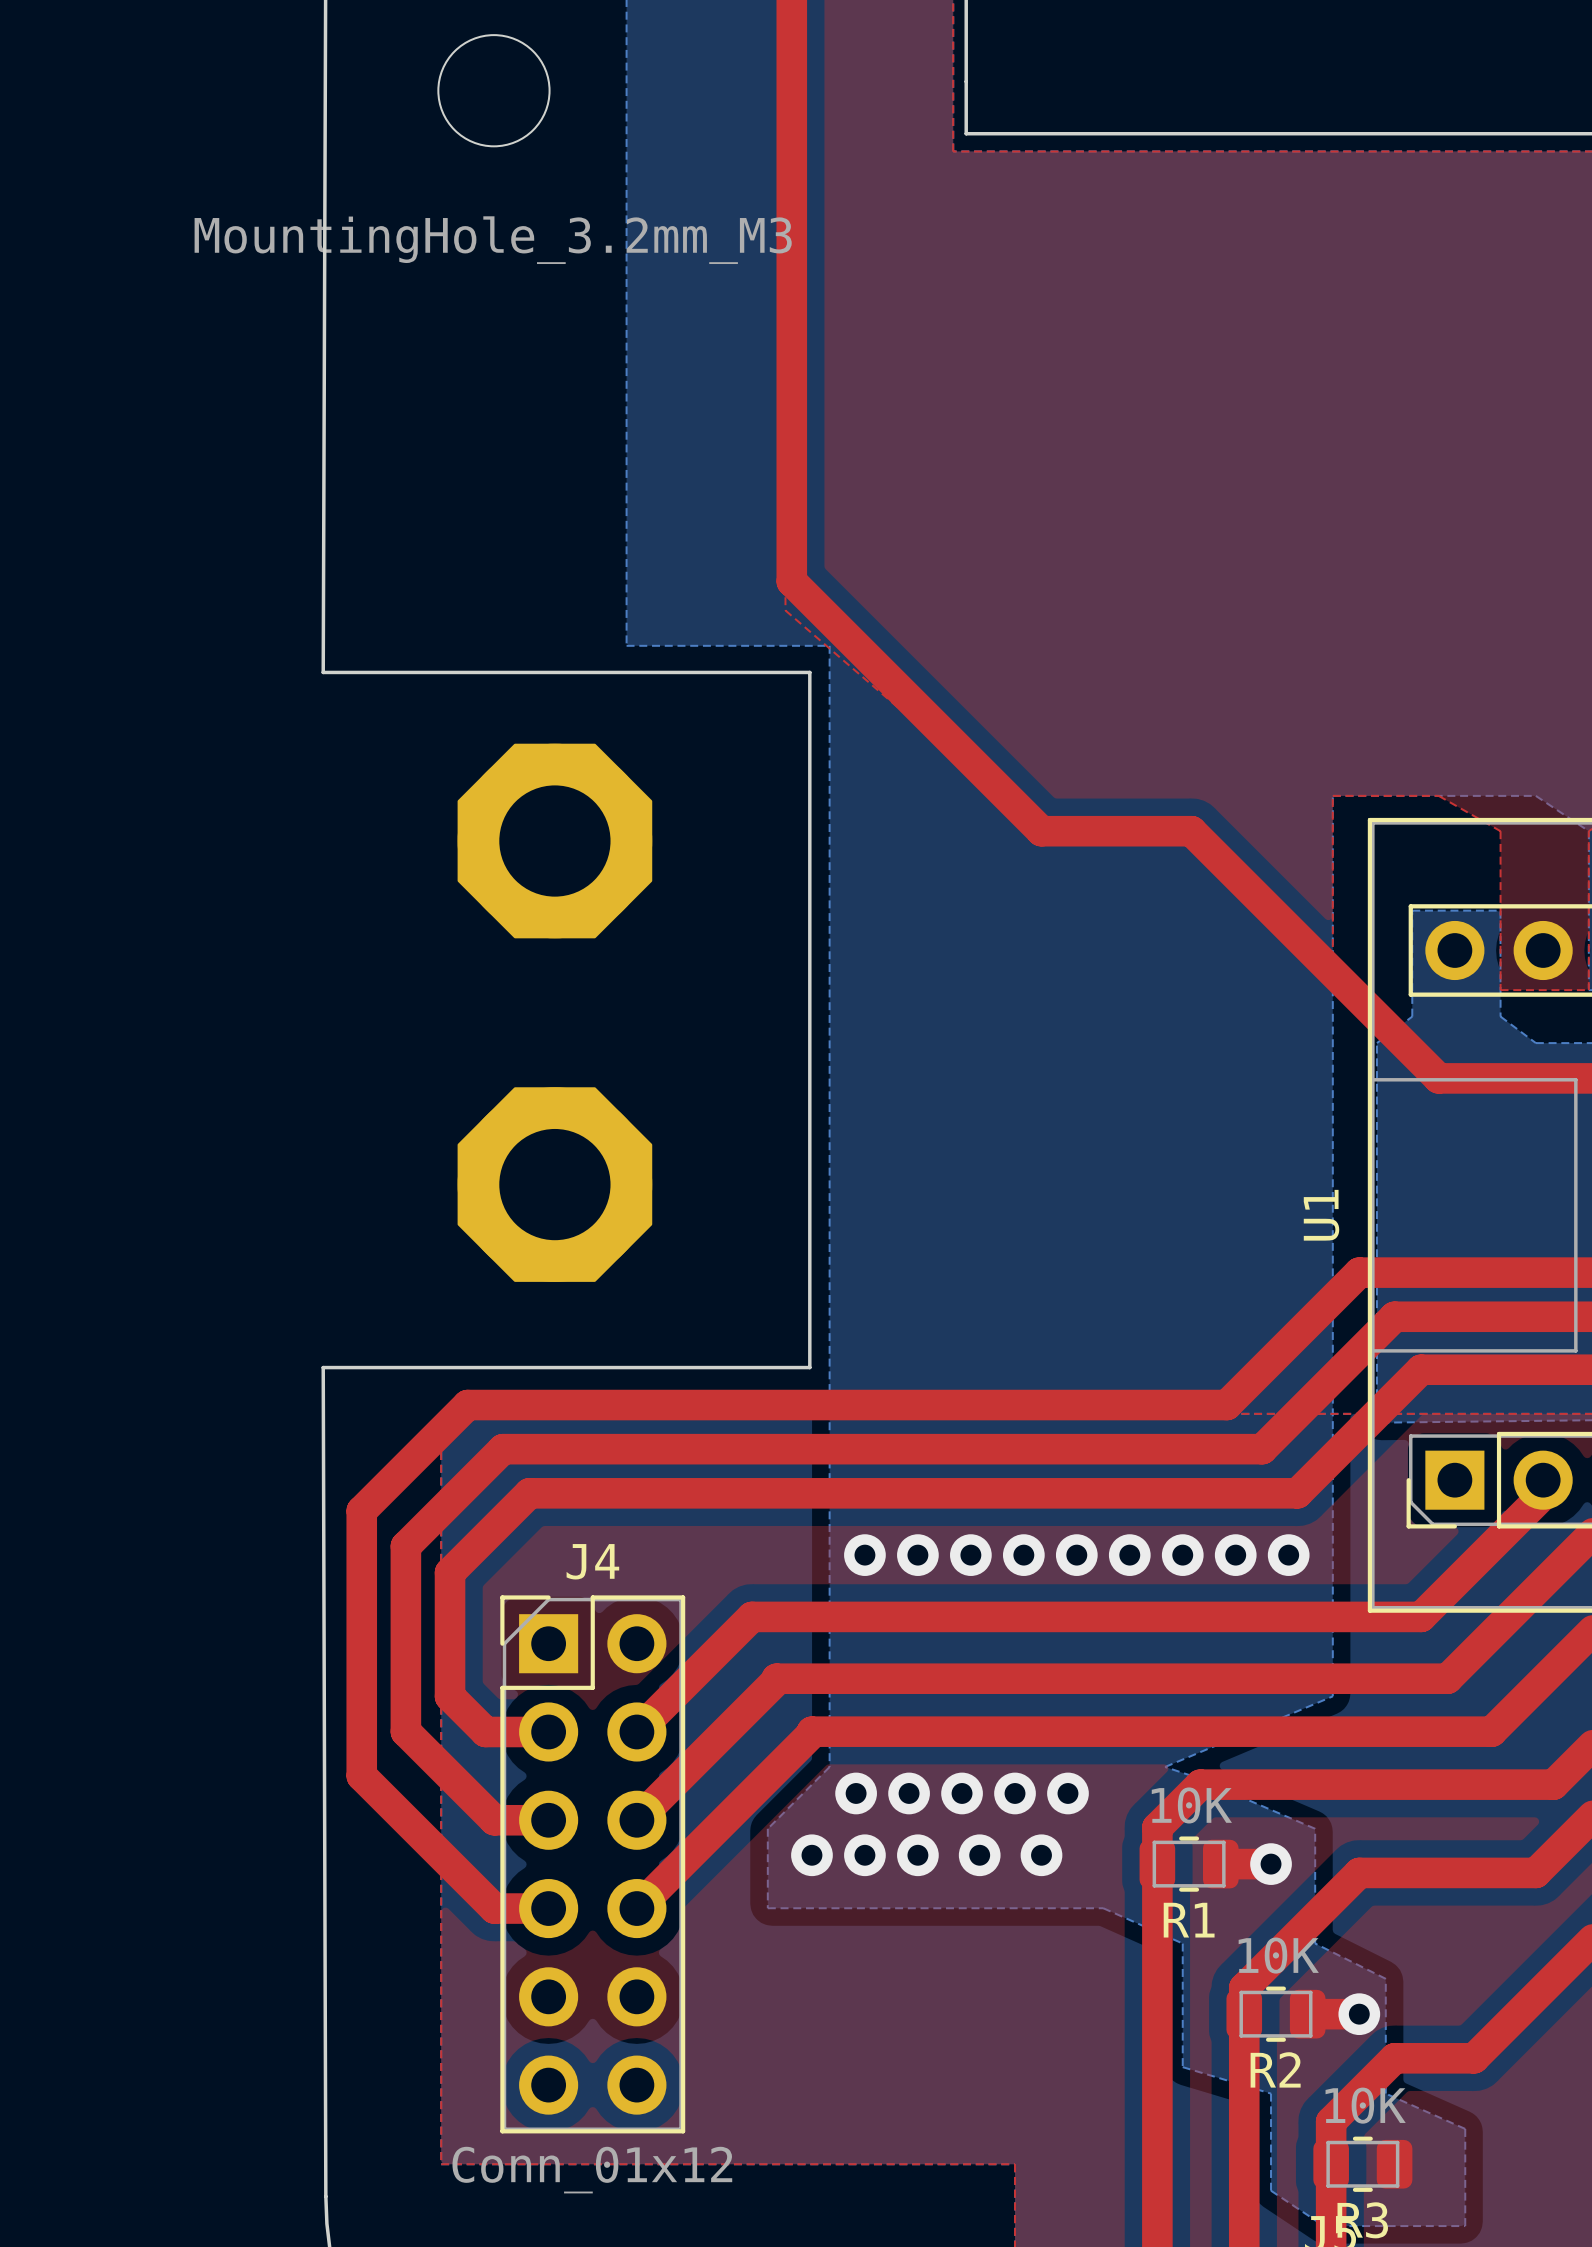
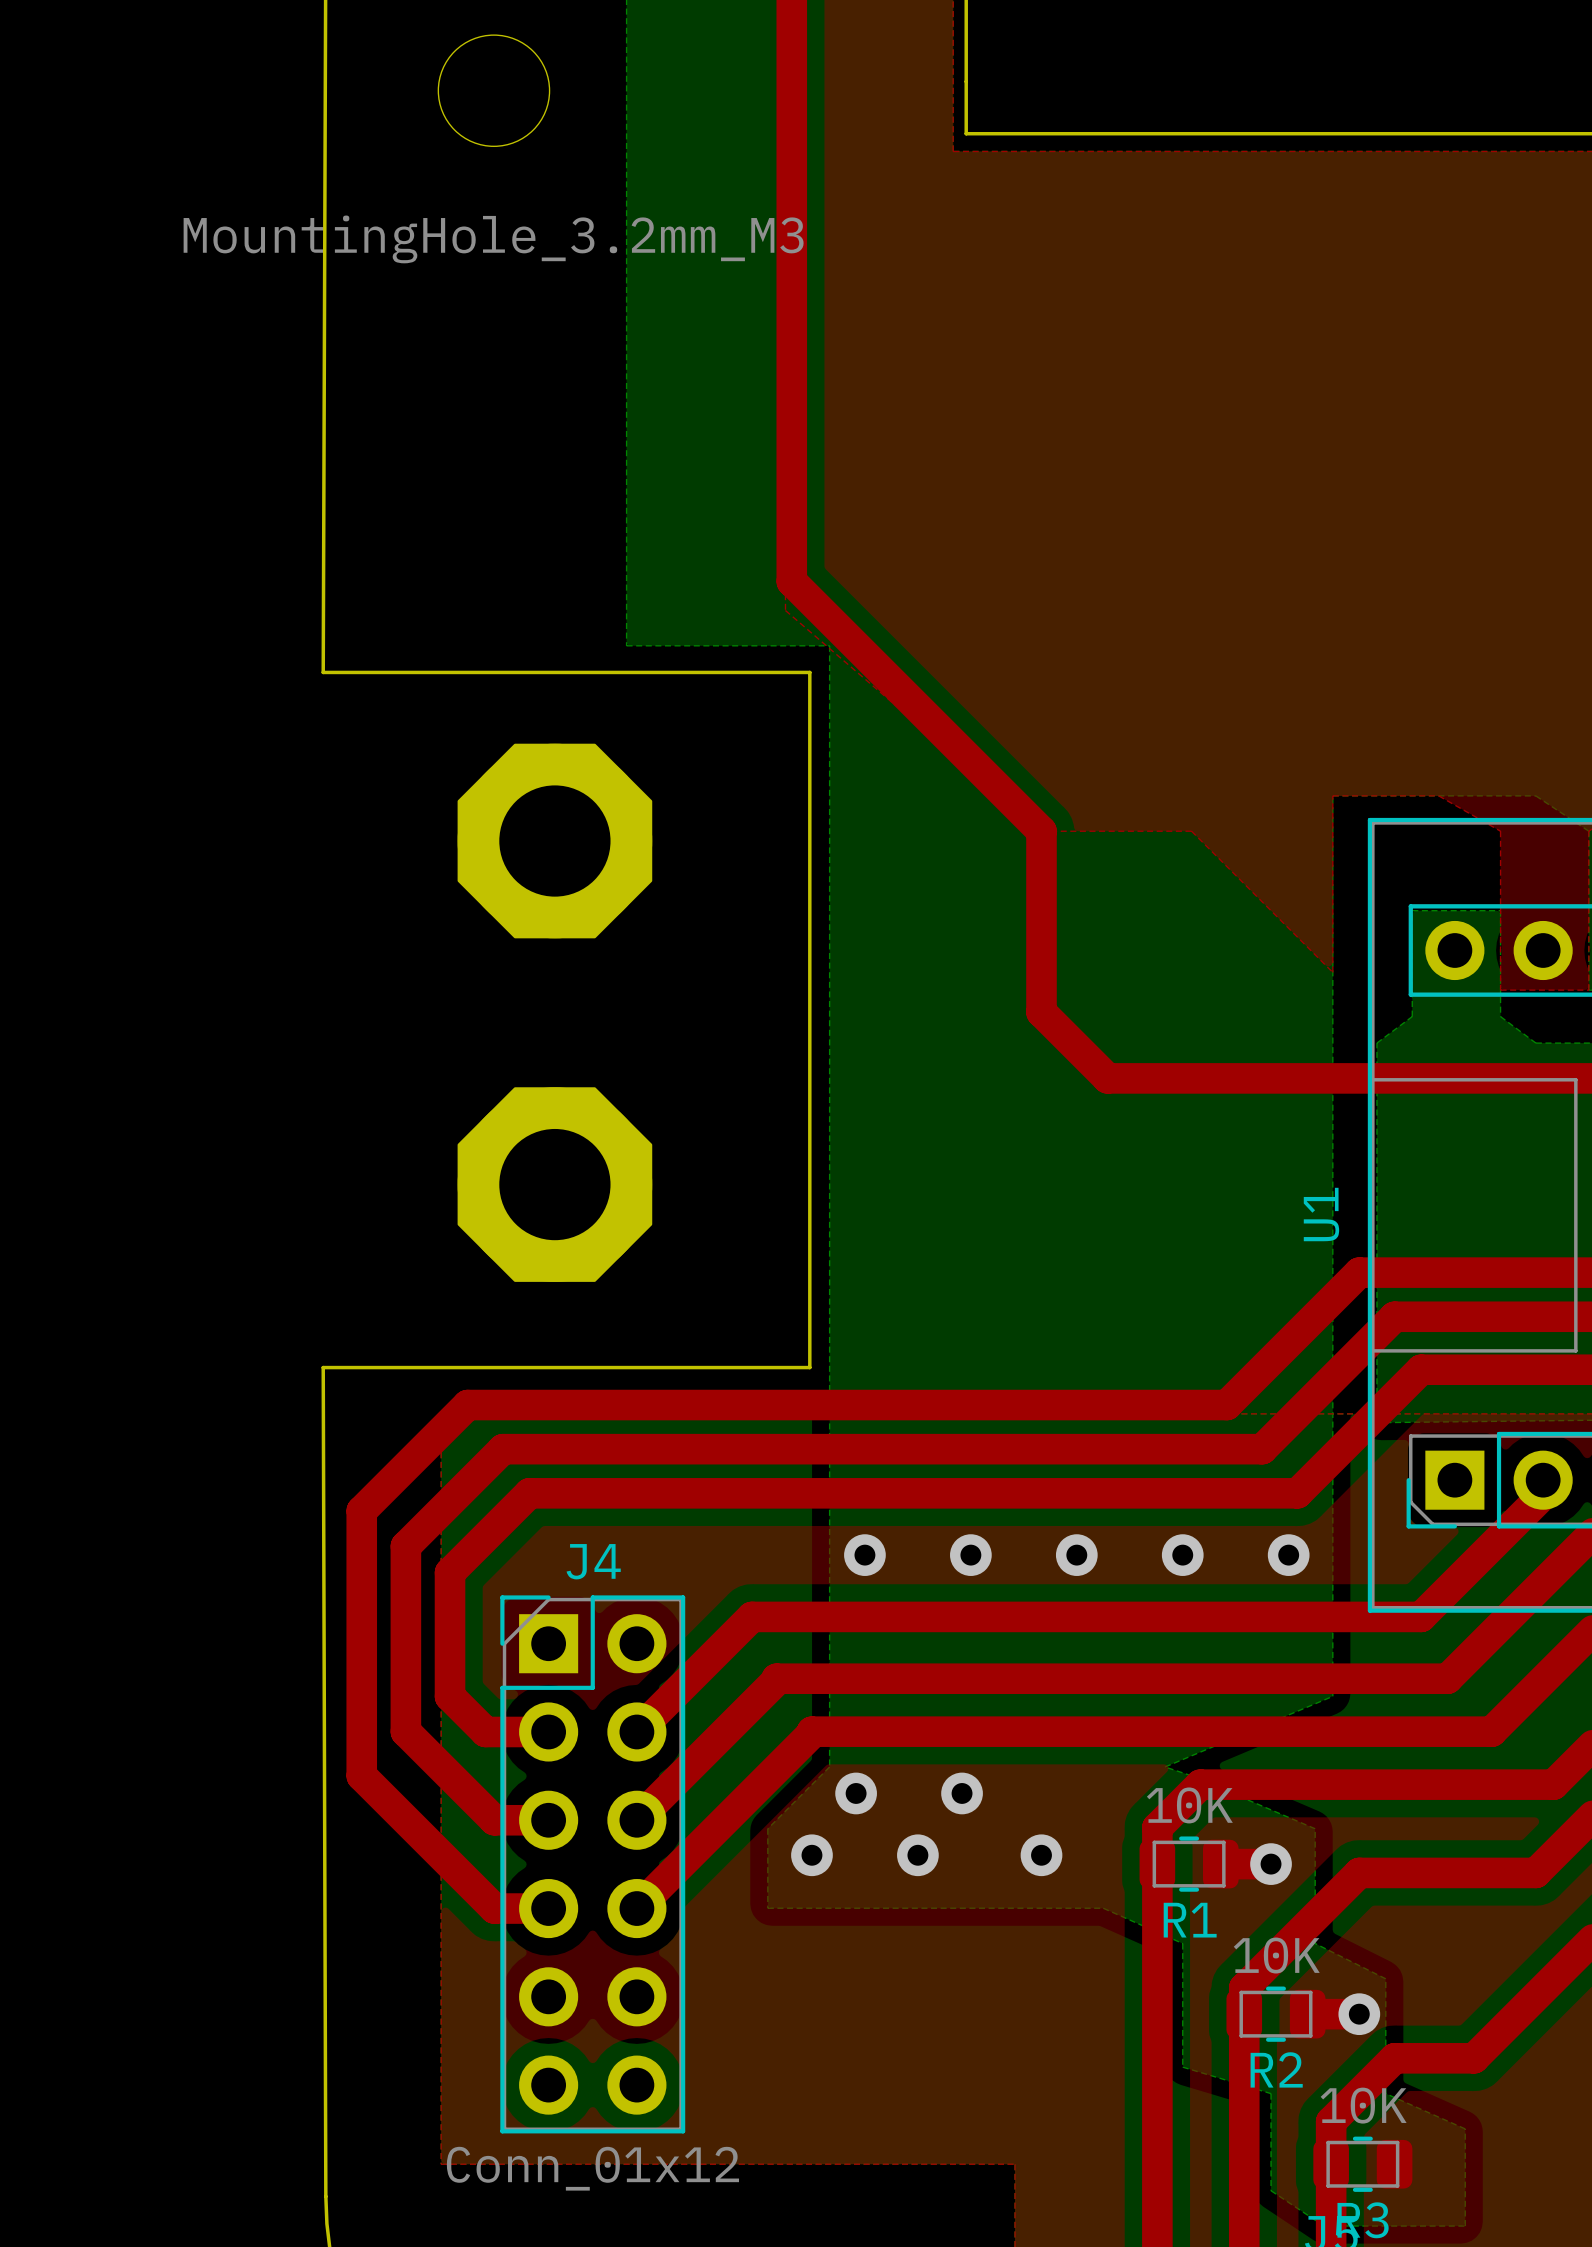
top track: (1041, 831) (1191, 831) (1438, 1078) -> (1041, 831) (1041, 1012) (1107, 1078) (1438, 1078)
via: (917, 1555) -> none
via: (1023, 1555) -> none
via: (1129, 1555) -> none
via: (1235, 1555) -> none
via: (909, 1793) -> none
via: (1015, 1793) -> none
via: (1067, 1793) -> none
via: (864, 1855) -> none
via: (979, 1855) -> none

